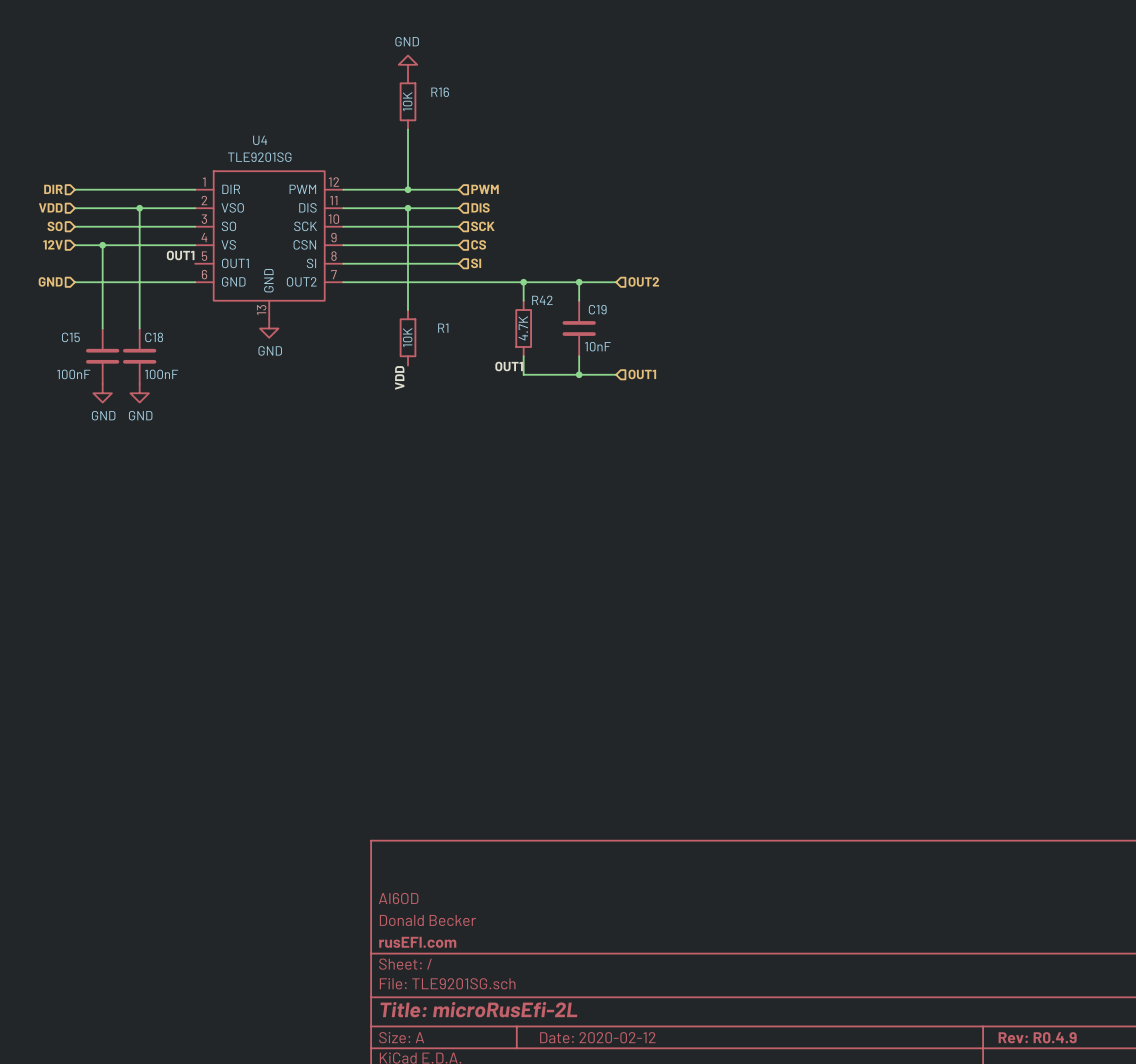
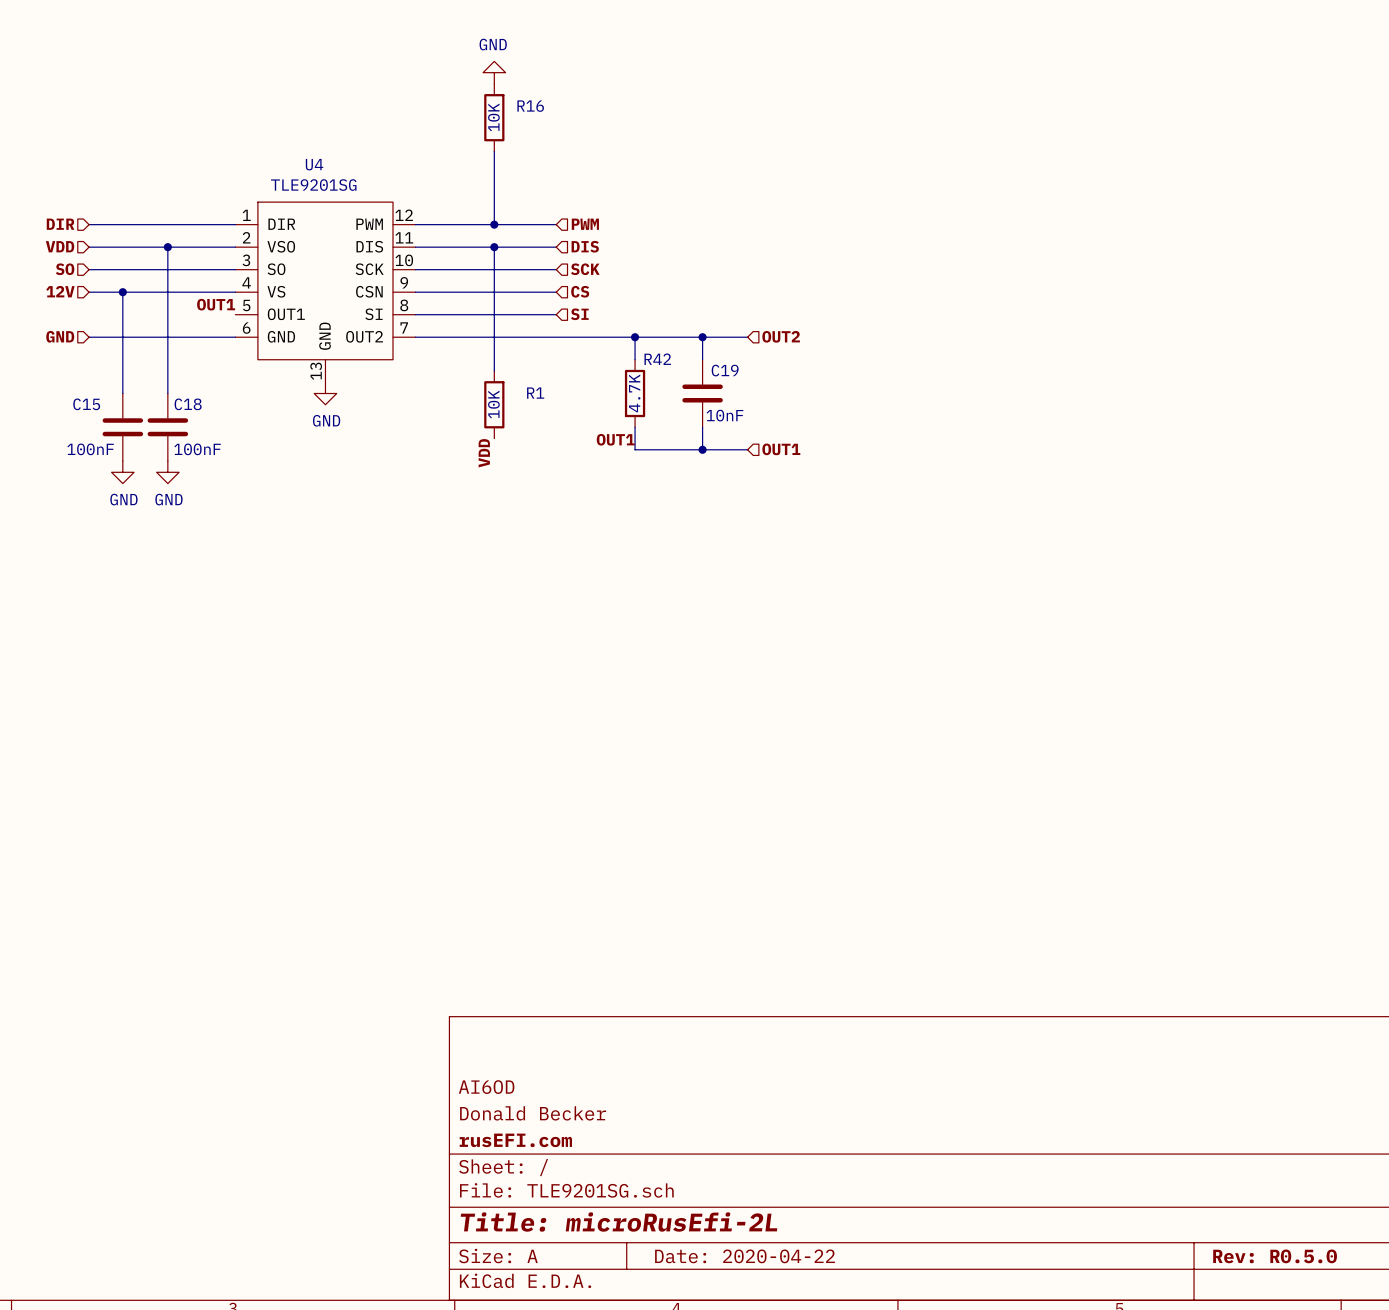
title block: Date: 2020-02-12 (597, 1037) -> Date: 2020-04-22 (745, 1256)
title block: Rev: R0.4.9 (1037, 1037) -> Rev: R0.5.0 (1275, 1256)

